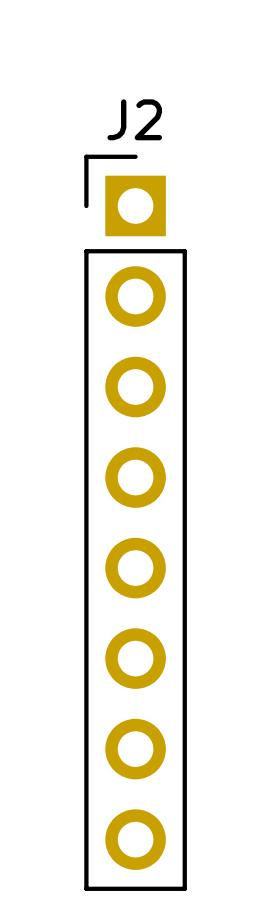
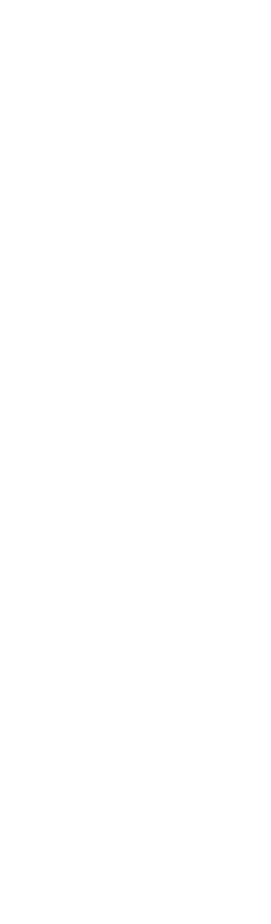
J2: (135, 522) -> none

